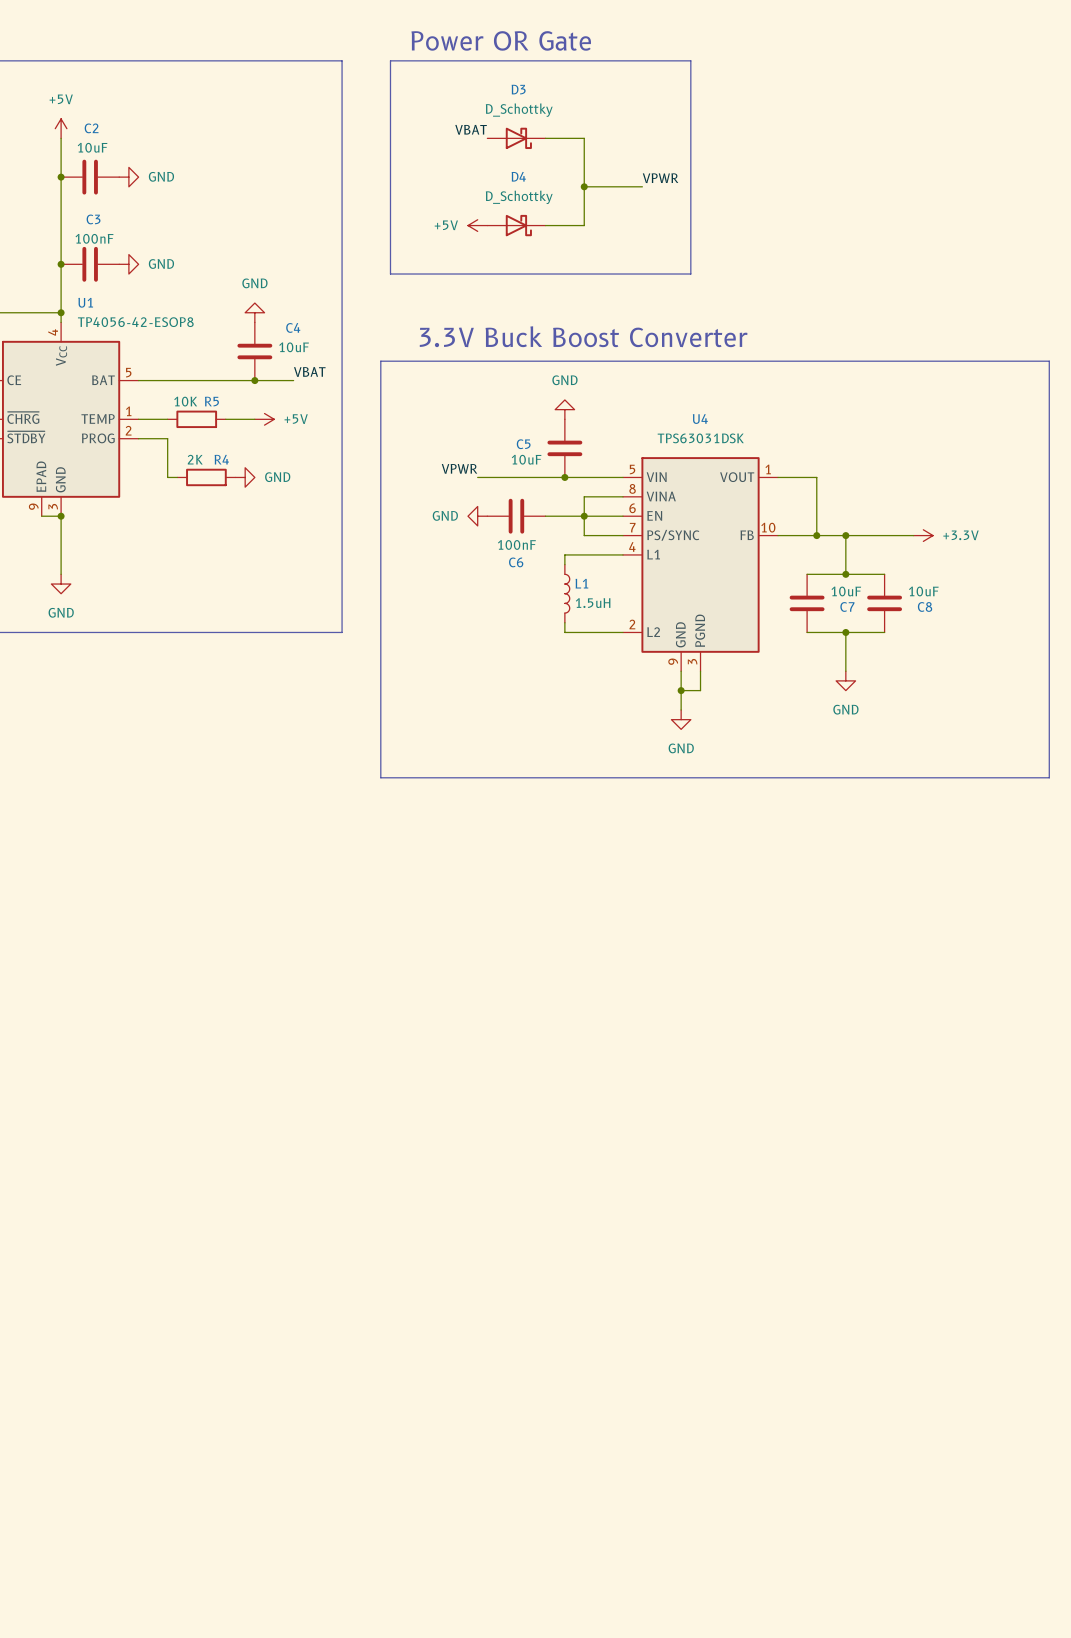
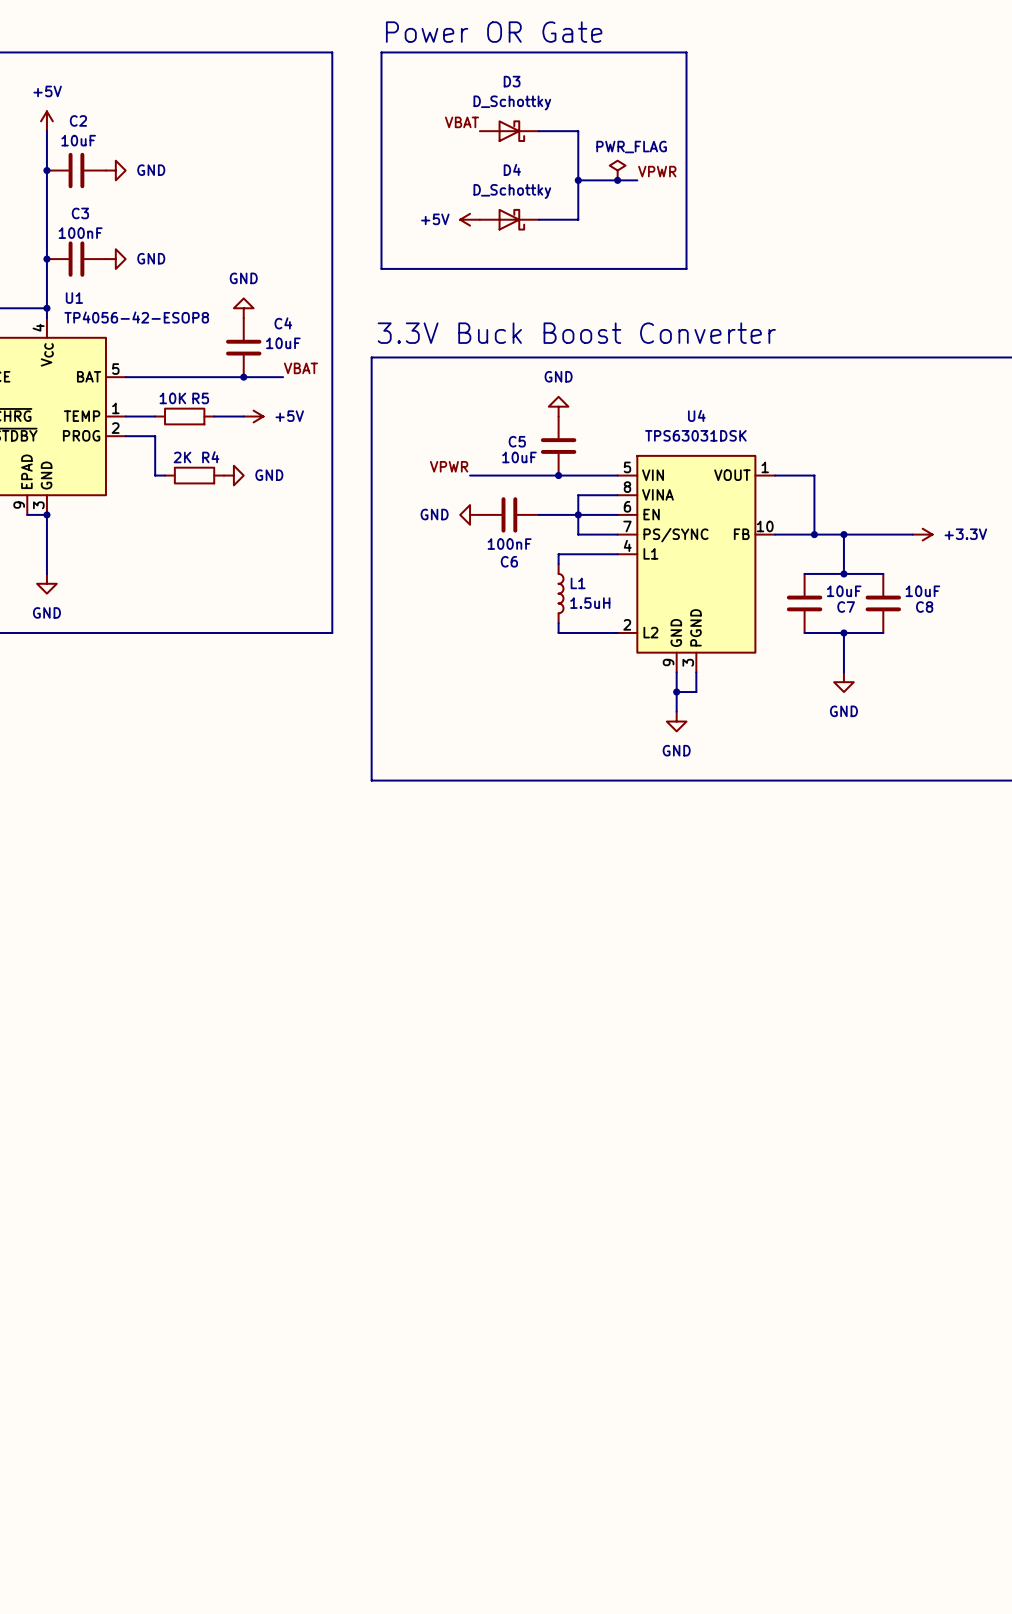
power symbol: none -> PWR_FLAG (617, 170)
junction: none -> (617, 180)

